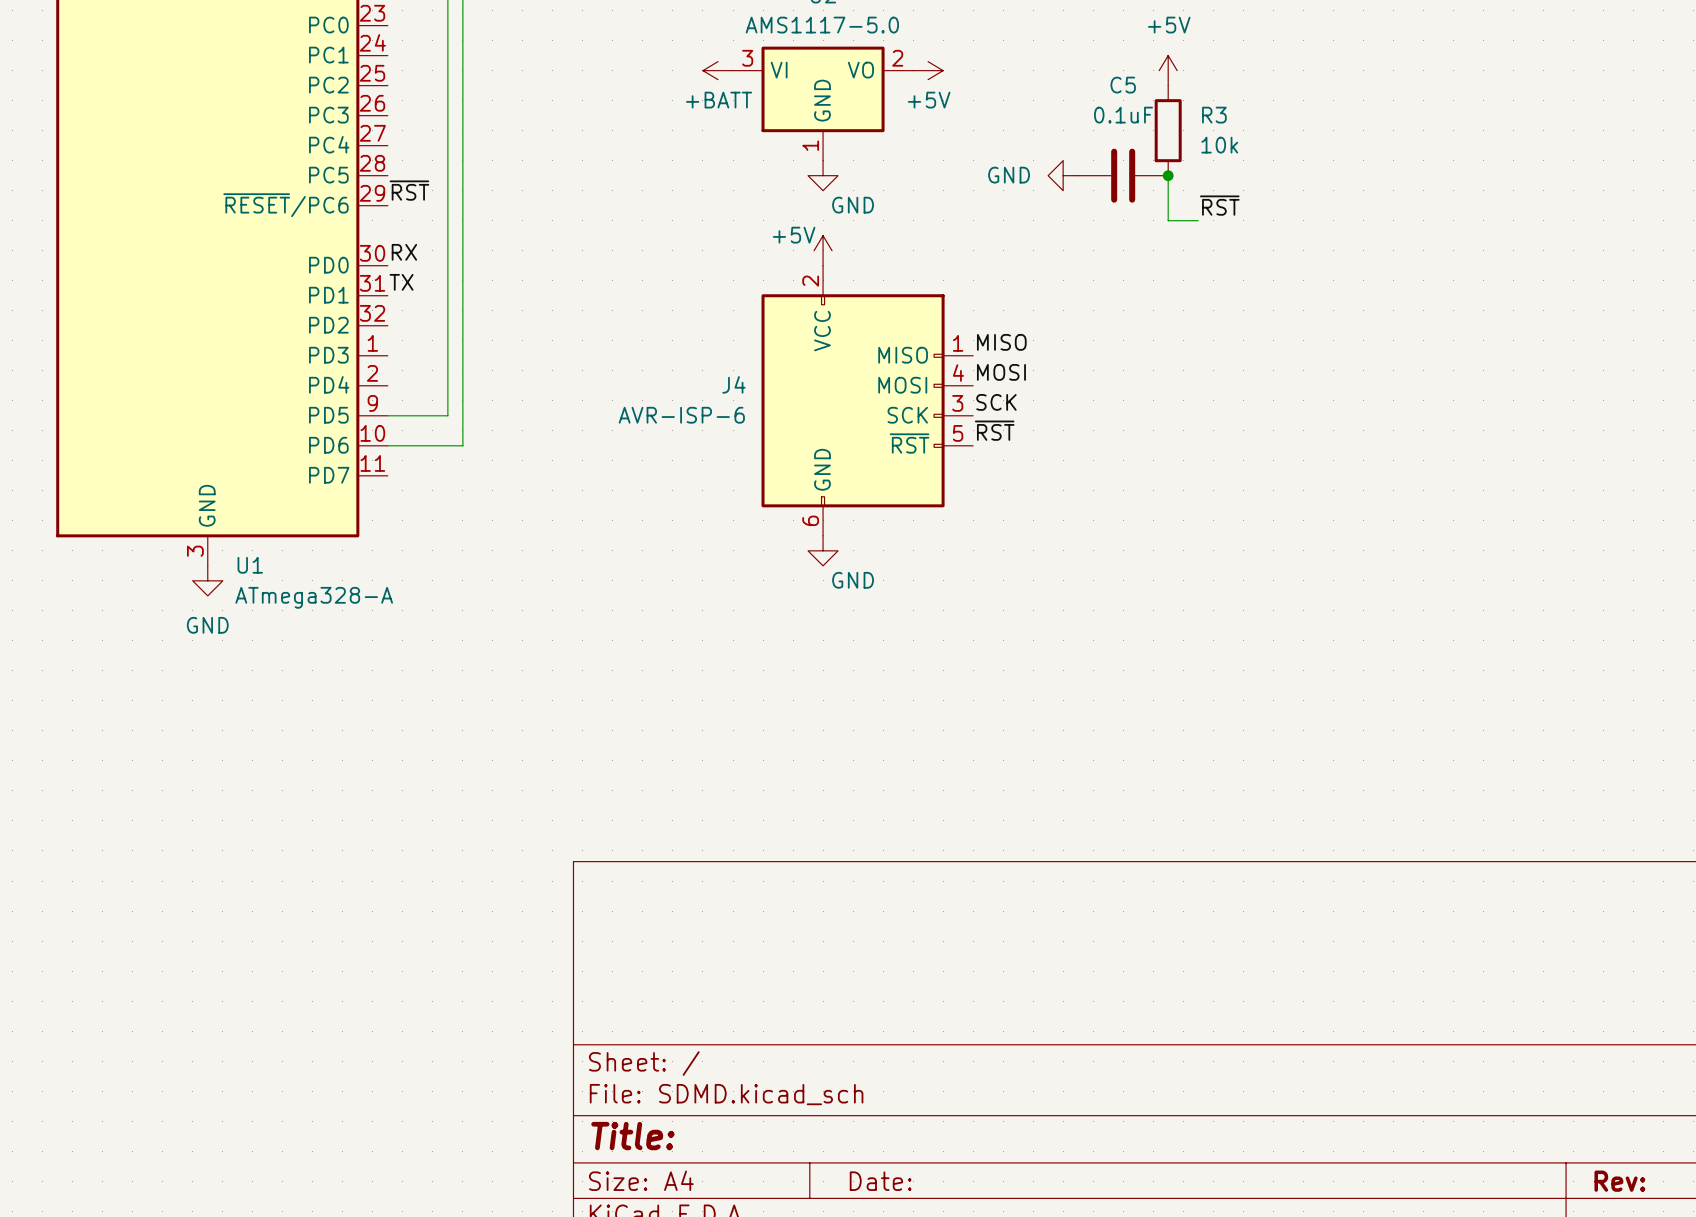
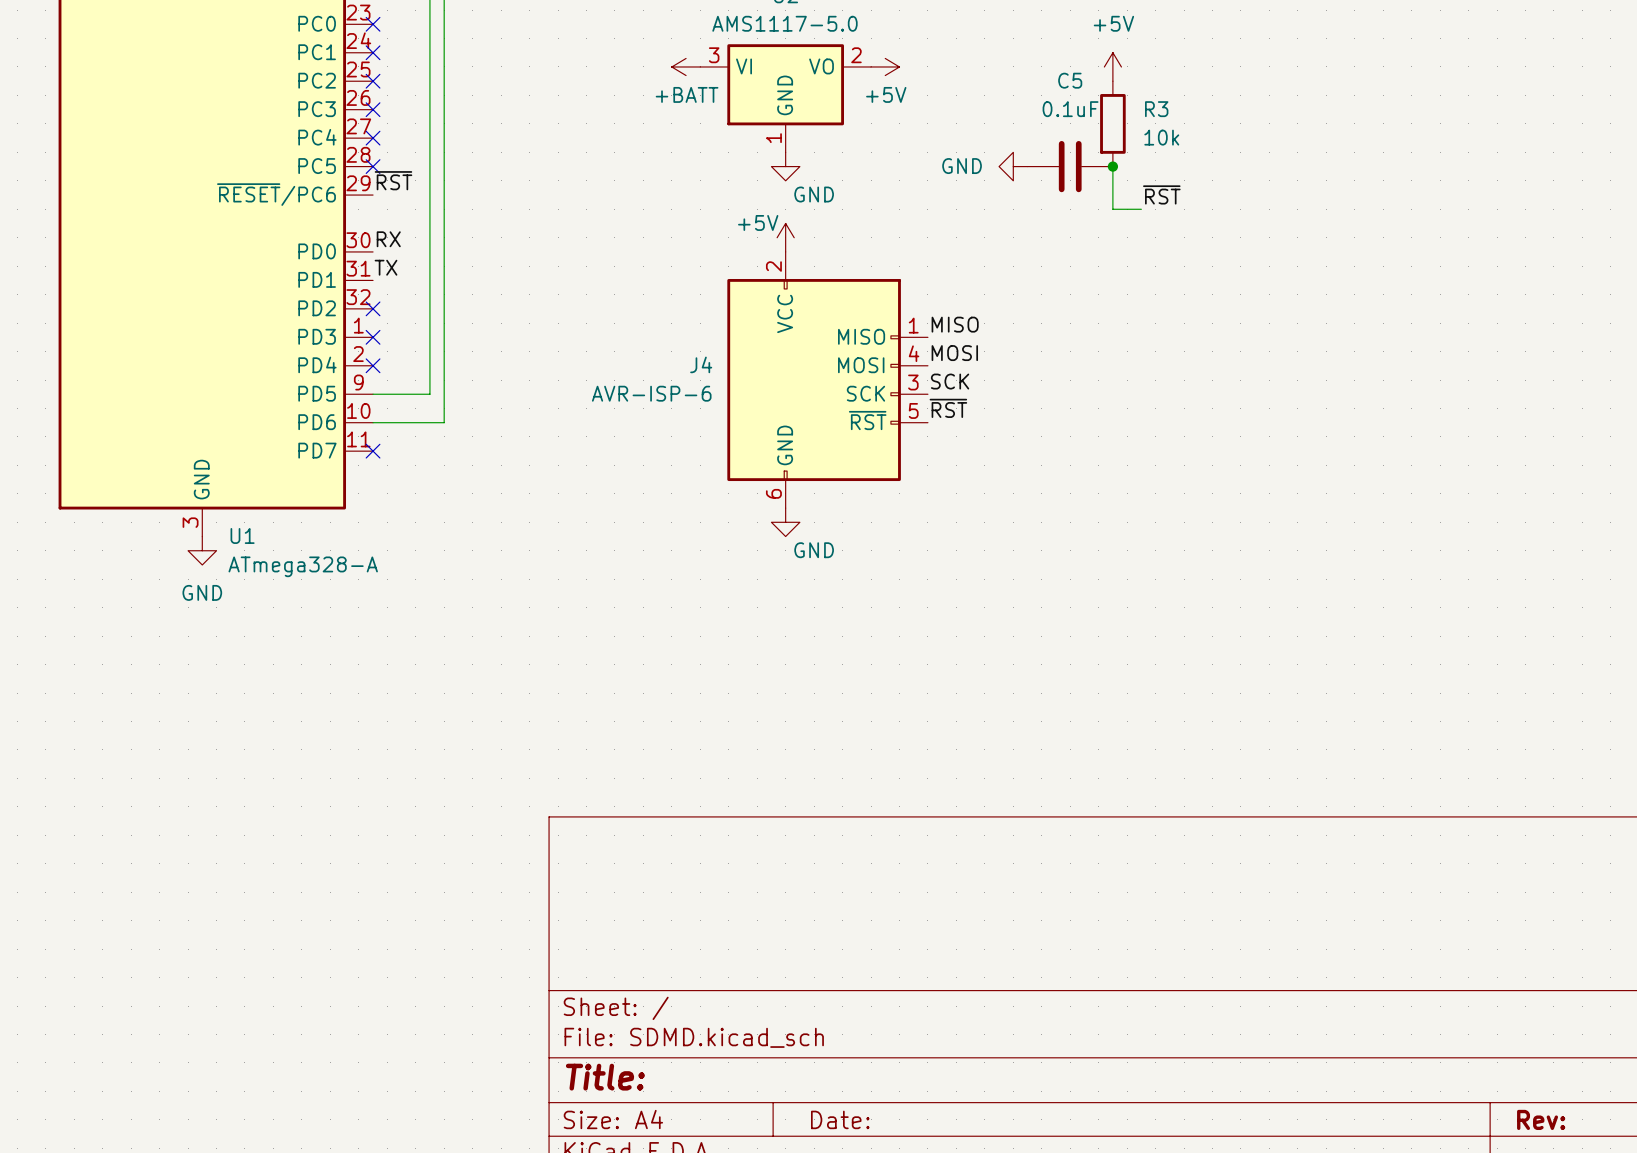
no-connect mark: none -> (373, 24)
no-connect mark: none -> (373, 52)
no-connect mark: none -> (373, 81)
no-connect mark: none -> (373, 109)
no-connect mark: none -> (373, 138)
no-connect mark: none -> (373, 166)
no-connect mark: none -> (373, 308)
no-connect mark: none -> (373, 337)
no-connect mark: none -> (373, 365)
no-connect mark: none -> (373, 451)

